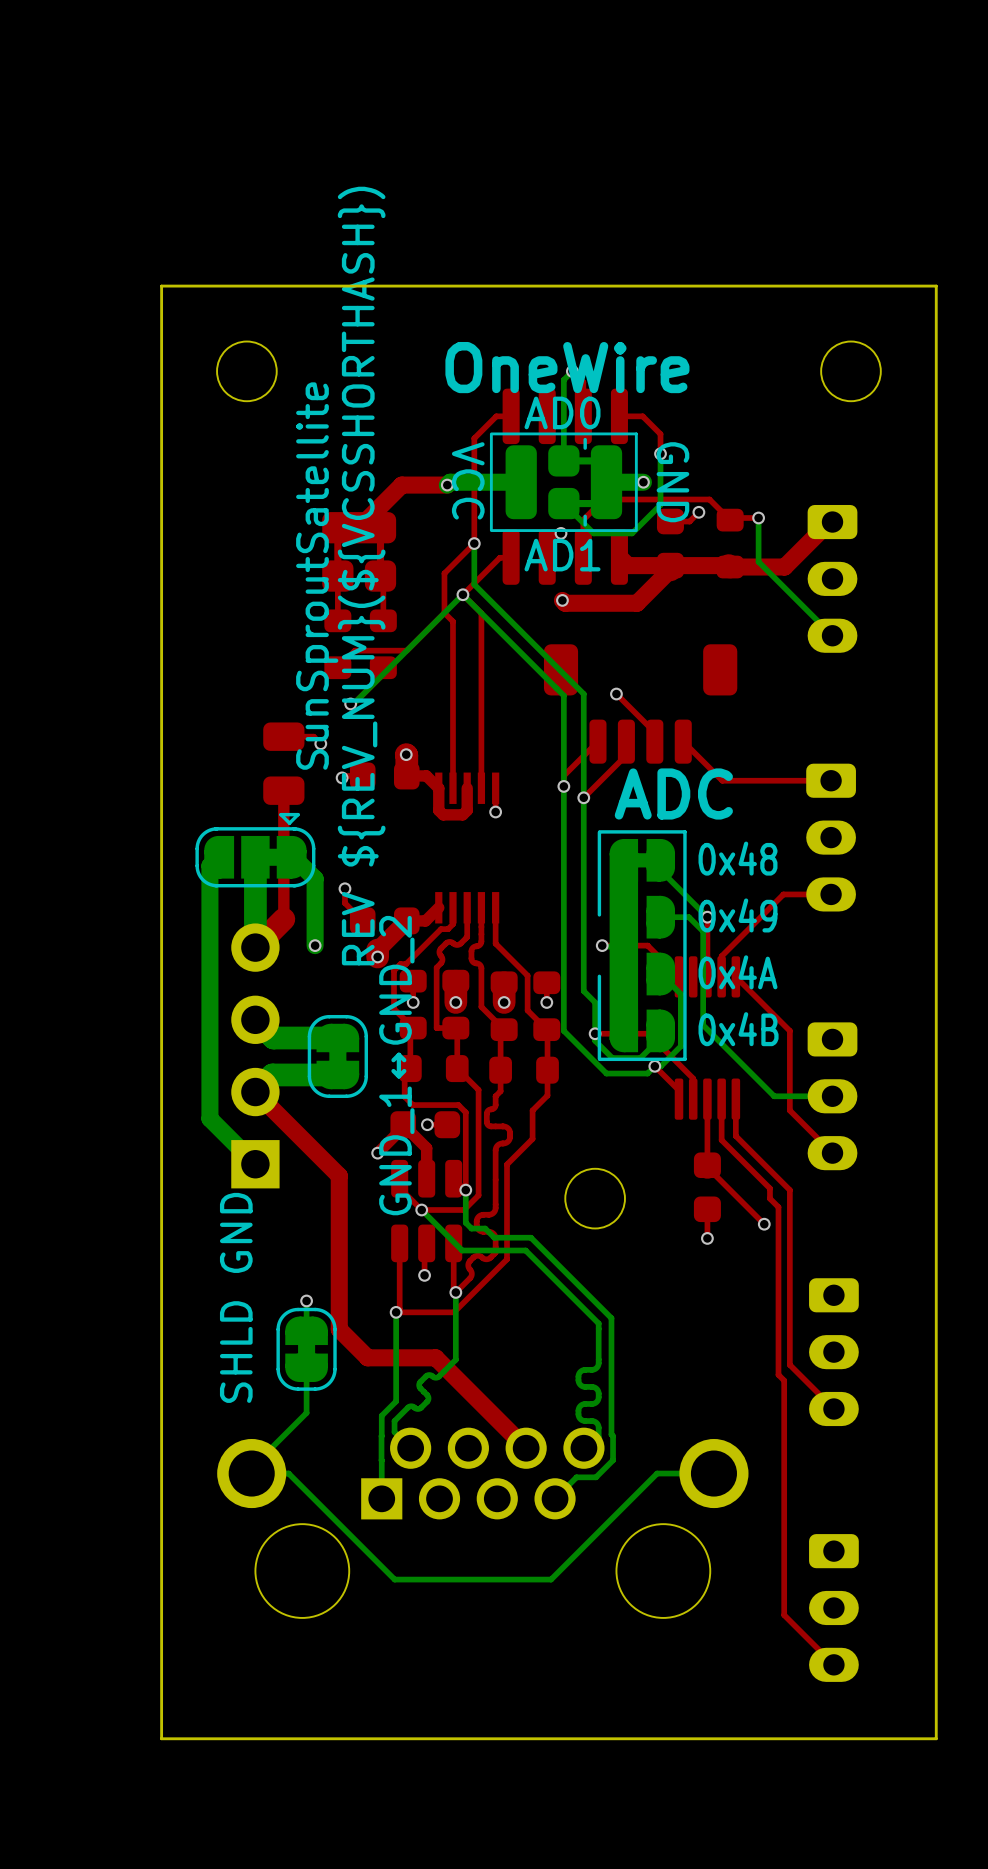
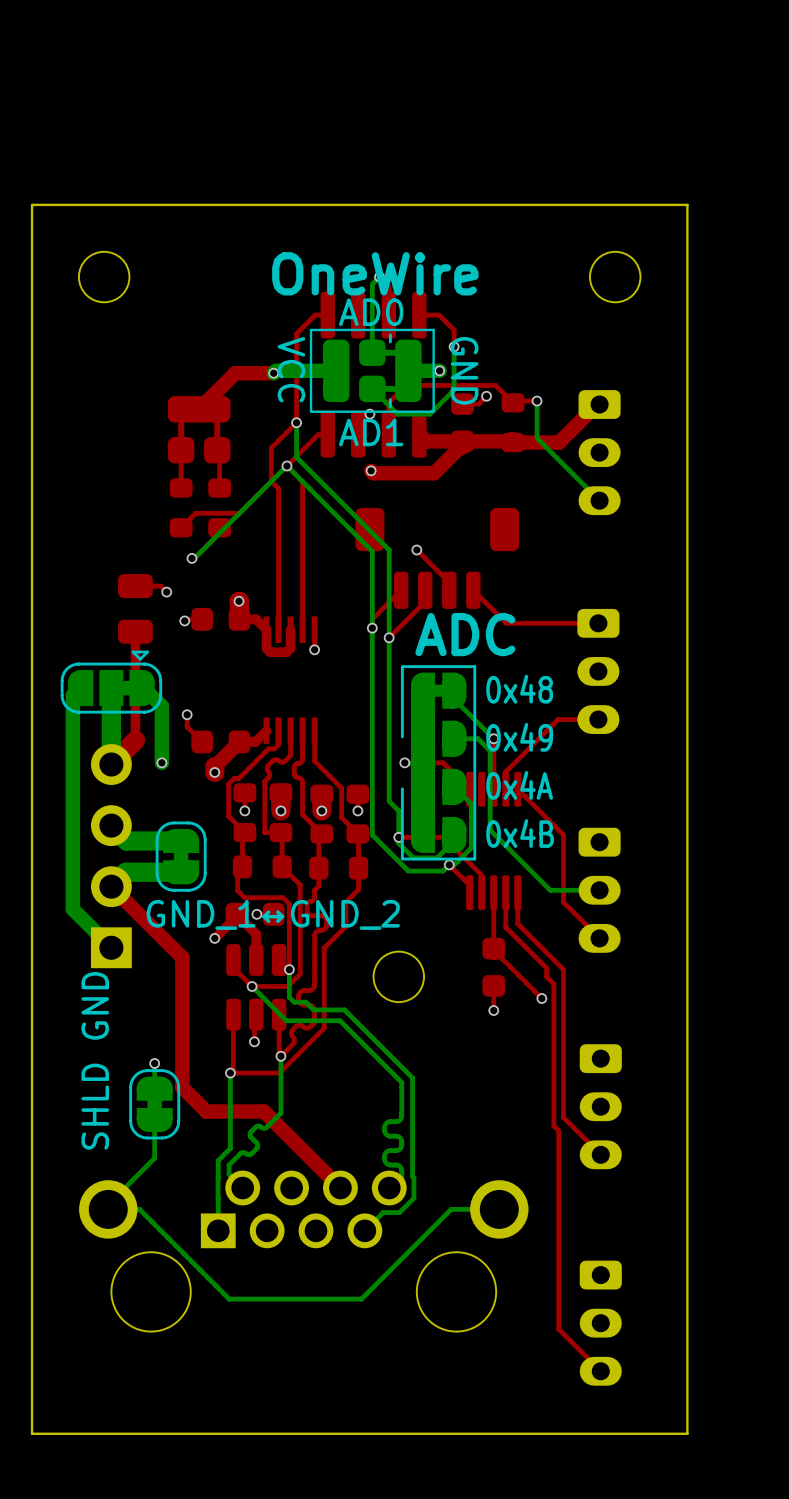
text: SunSproutSatellite (317, 576) -> none
text: REV ${REV_NUM}(${VCSSHORTHASH}) (361, 576) -> none
text rotation: 0° (396, 1065) -> 90° clockwise (273, 914)

